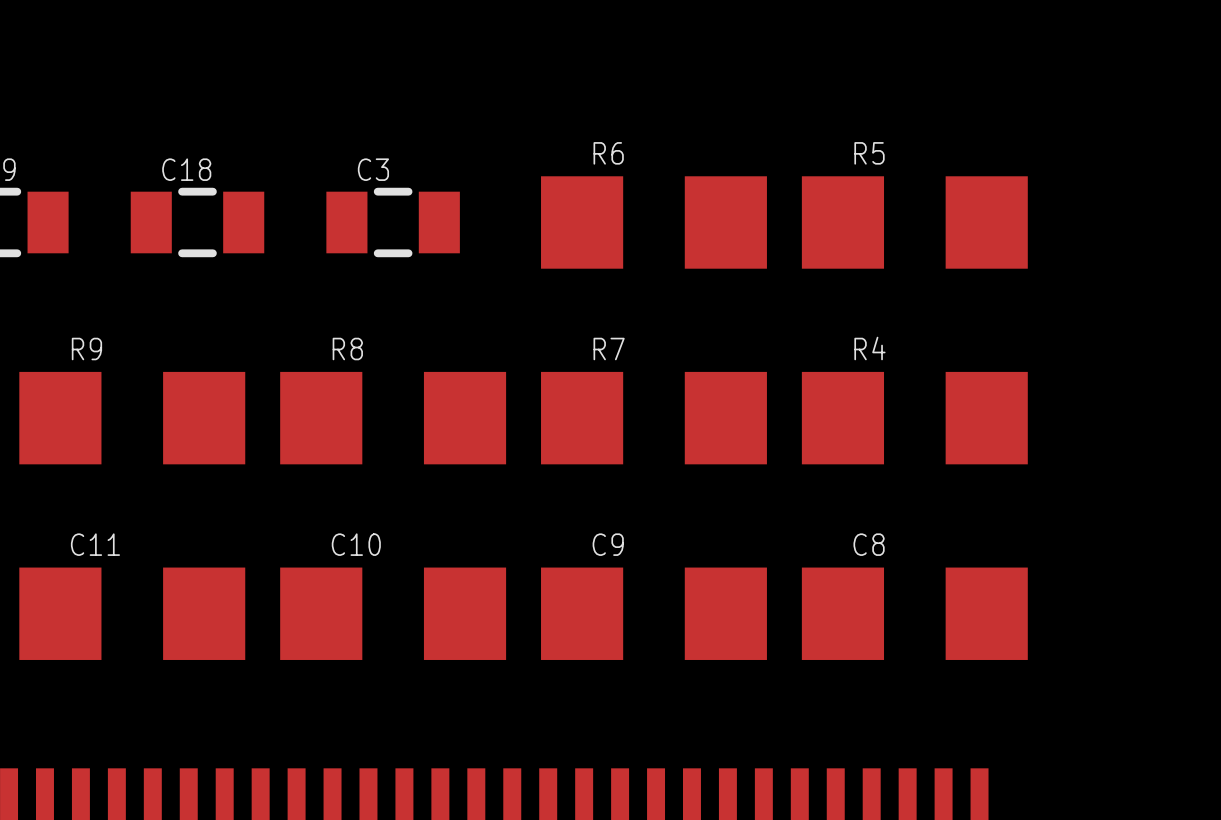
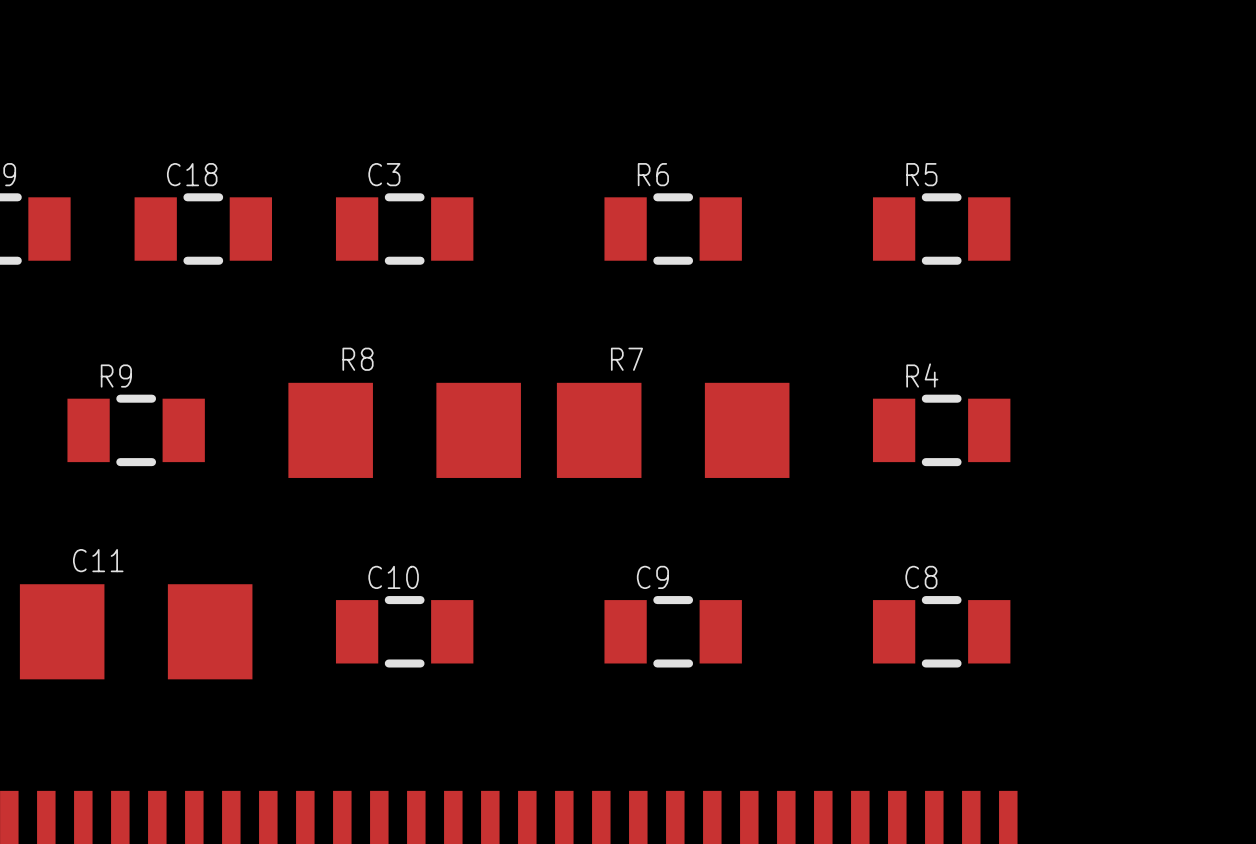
R6 footprint: [541, 176, 767, 269] -> [604, 193, 742, 265]
R5 footprint: [801, 176, 1028, 269] -> [872, 193, 1011, 265]
R9 footprint: [19, 371, 246, 465] -> [67, 394, 205, 467]
R4 footprint: [801, 371, 1028, 465] -> [872, 394, 1011, 467]
C10 footprint: [280, 567, 507, 660] -> [335, 596, 474, 668]
C9 footprint: [541, 567, 767, 660] -> [604, 596, 742, 668]
C8 footprint: [801, 567, 1028, 660] -> [872, 596, 1011, 668]

